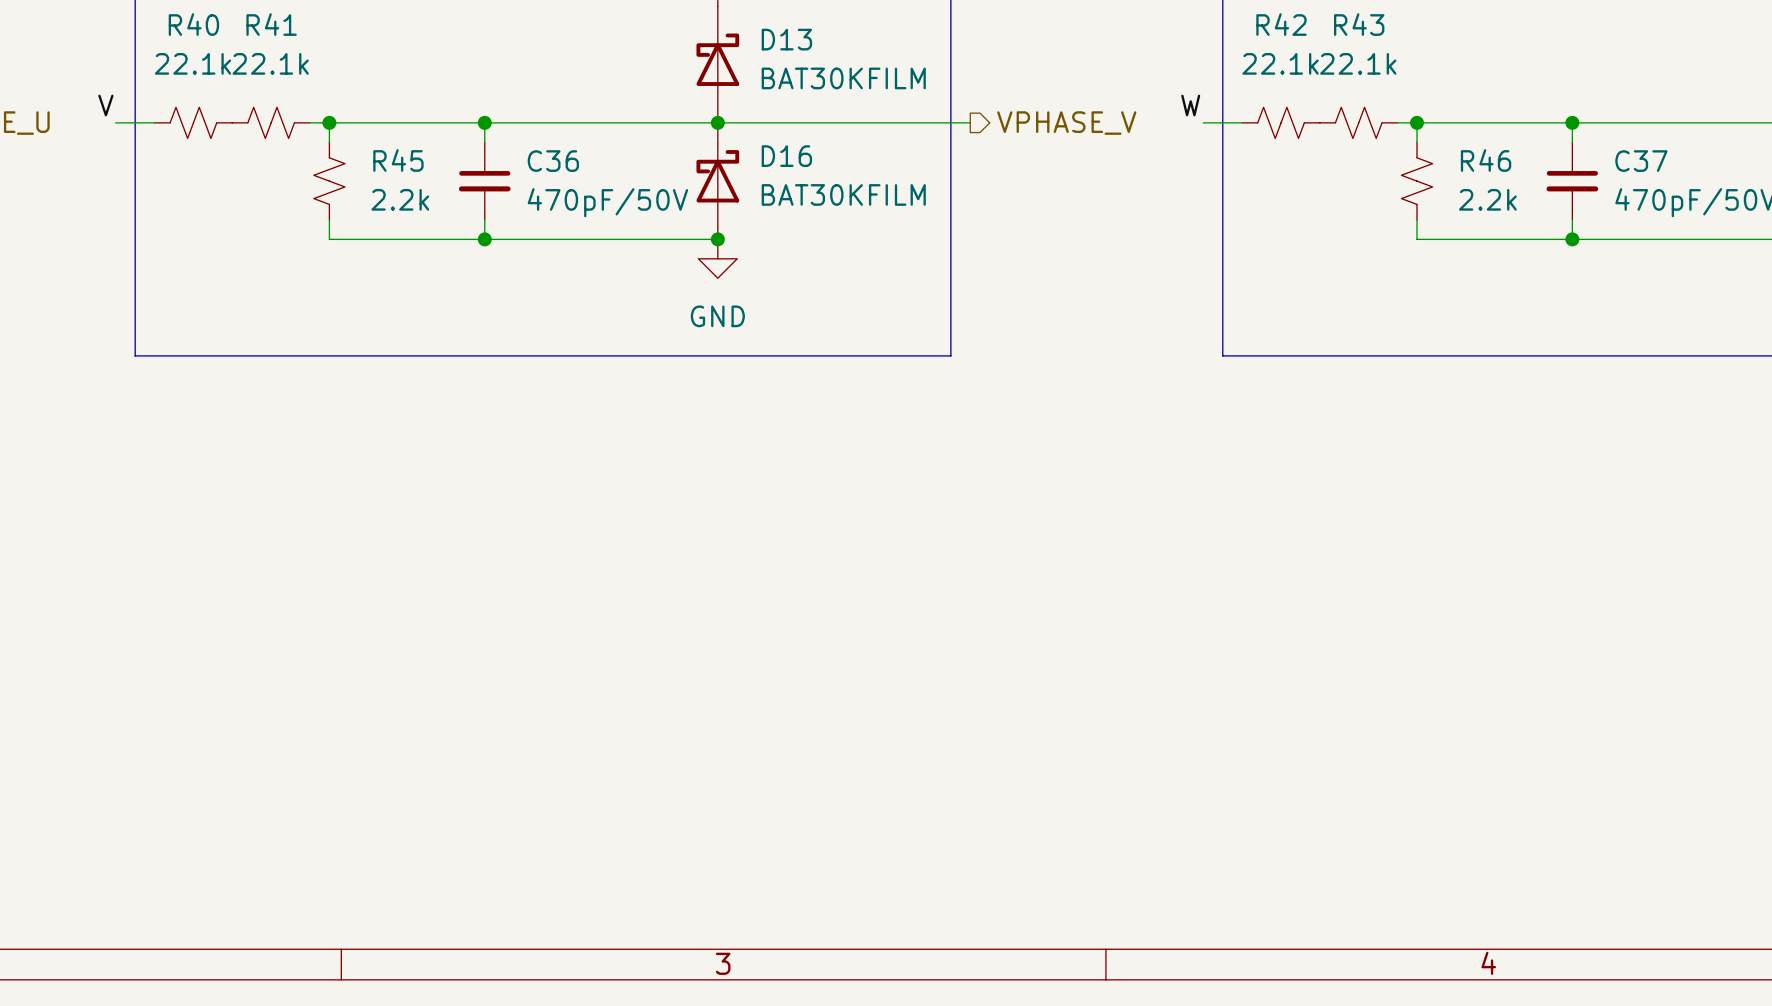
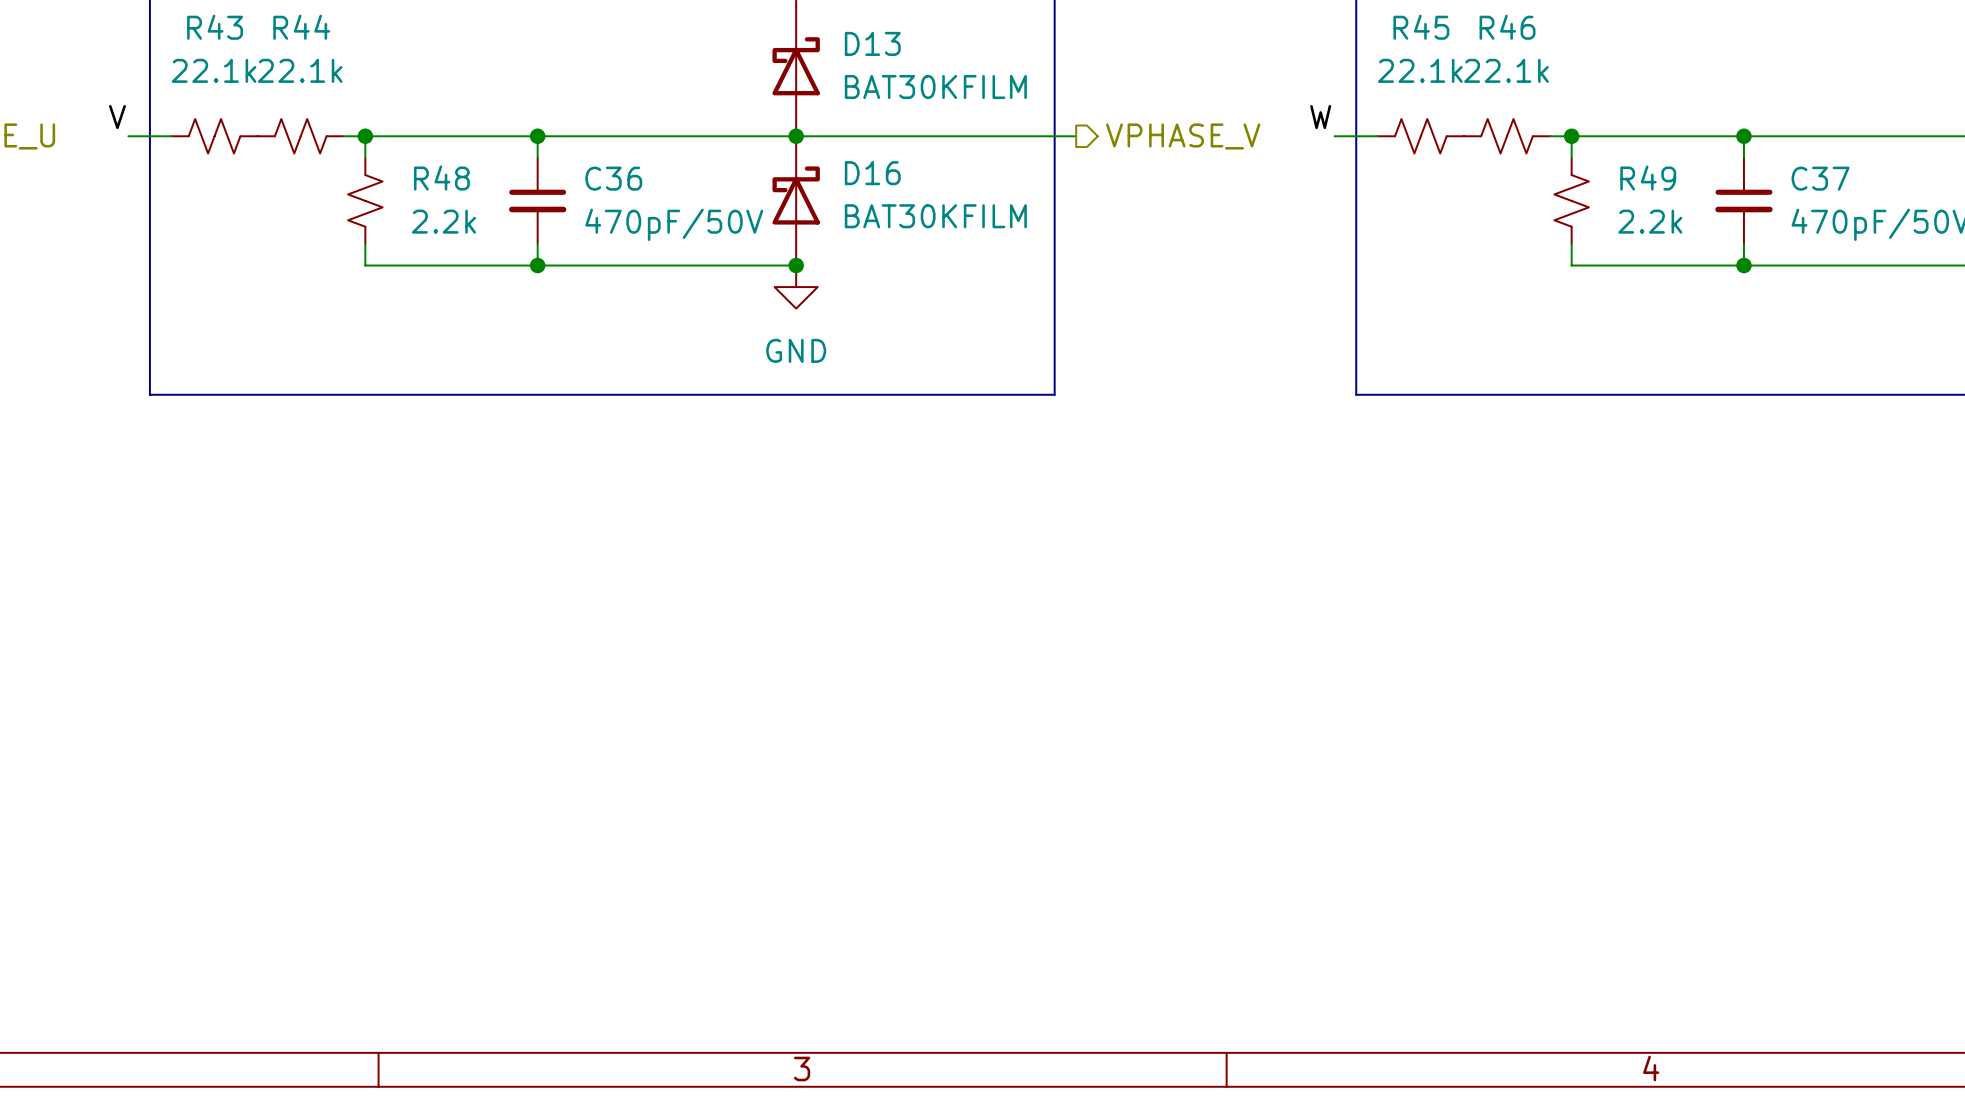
R40 name: R40 (193, 24) -> R43 (215, 27)
R41 name: R41 (271, 24) -> R44 (301, 27)
R42 name: R42 (1281, 24) -> R45 (1421, 27)
R43 name: R43 (1359, 24) -> R46 (1507, 27)
R45 name: R45 (398, 160) -> R48 (441, 178)
R46 name: R46 (1486, 160) -> R49 (1648, 178)

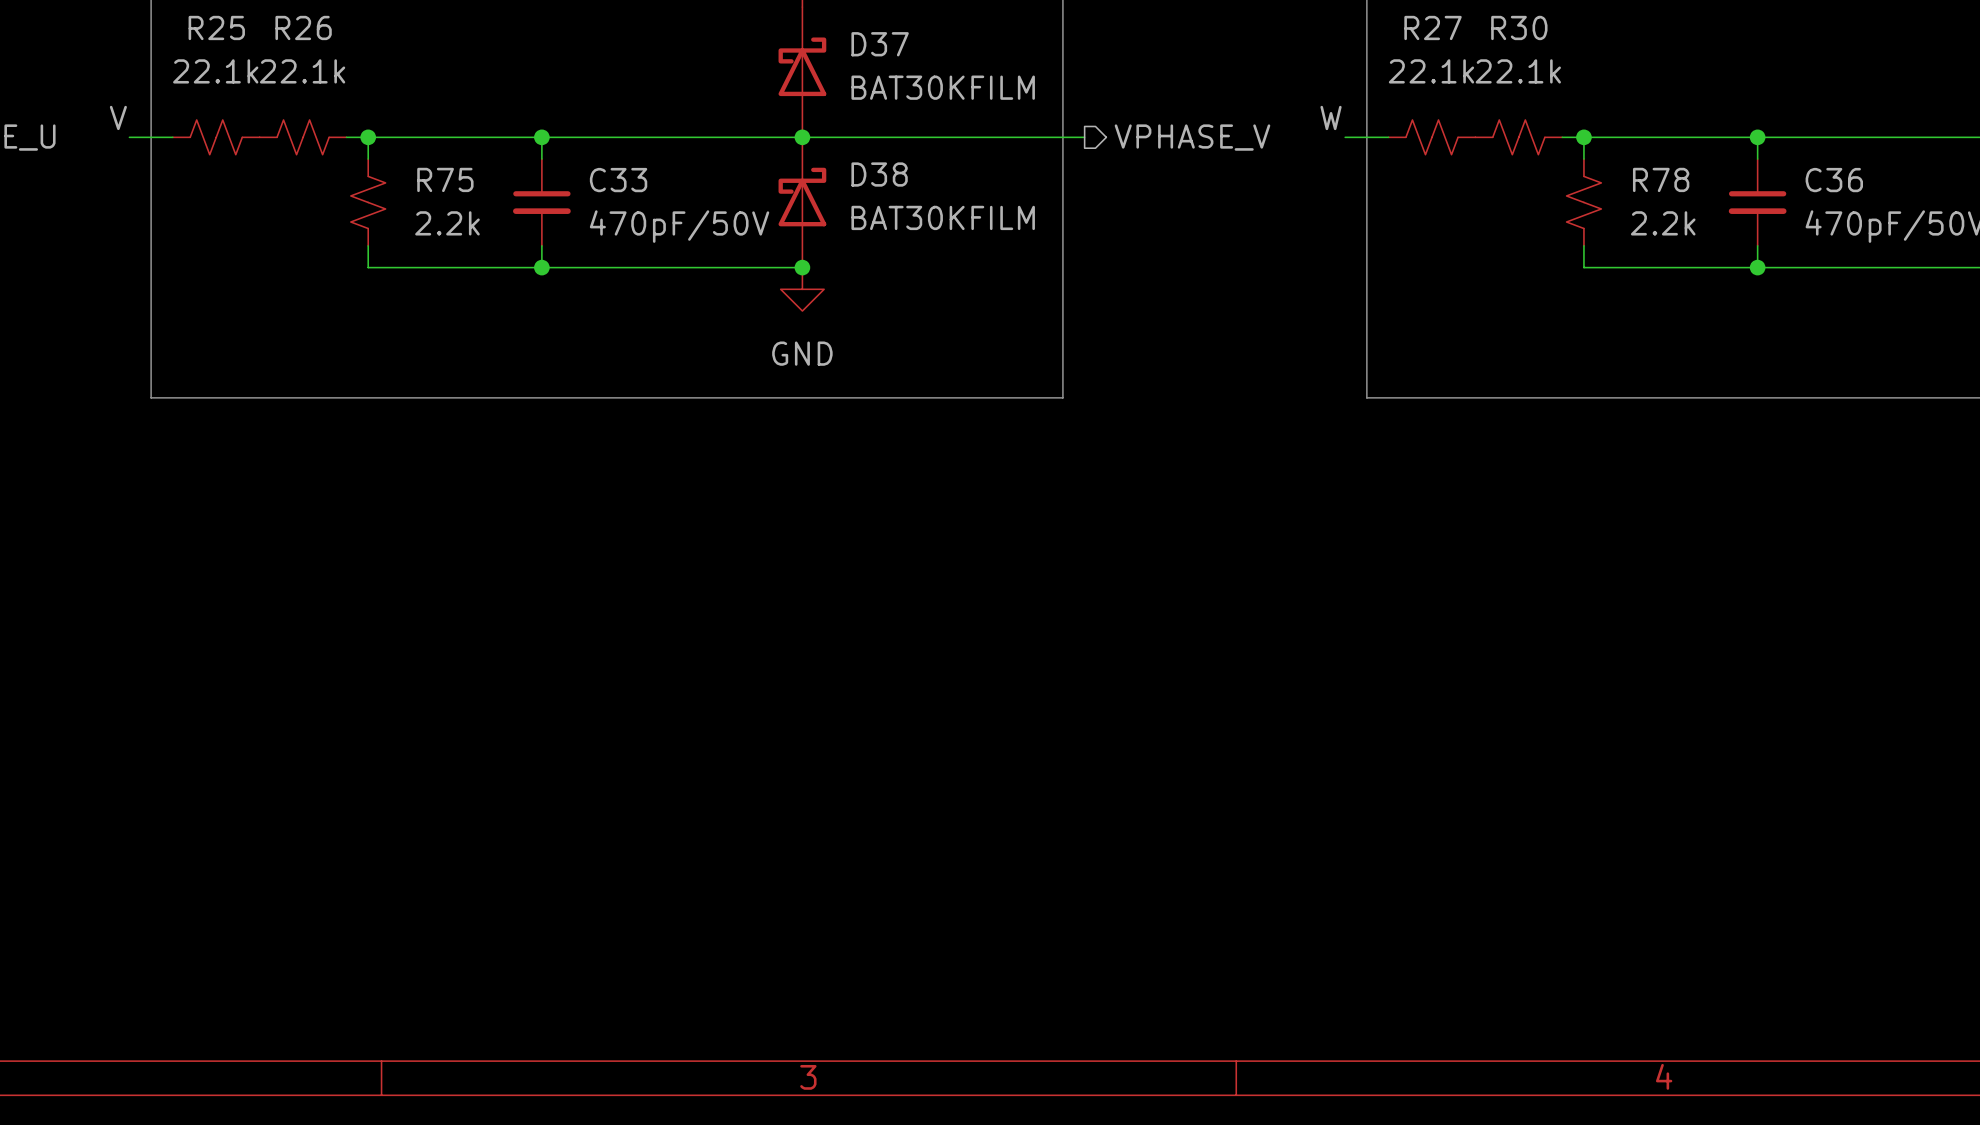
R43 name: R43 (215, 27) -> R25 (216, 27)
R44 name: R44 (301, 27) -> R26 (303, 27)
R45 name: R45 (1421, 27) -> R27 (1433, 27)
R46 name: R46 (1507, 27) -> R30 (1519, 27)
D13 name: D13 (872, 43) -> D37 (880, 44)
D16 name: D16 (872, 173) -> D38 (879, 174)
R48 name: R48 (441, 178) -> R75 (445, 179)
C36 name: C36 (613, 178) -> C33 (618, 180)
R49 name: R49 (1648, 178) -> R78 (1661, 179)
C37 name: C37 (1820, 178) -> C36 (1834, 180)

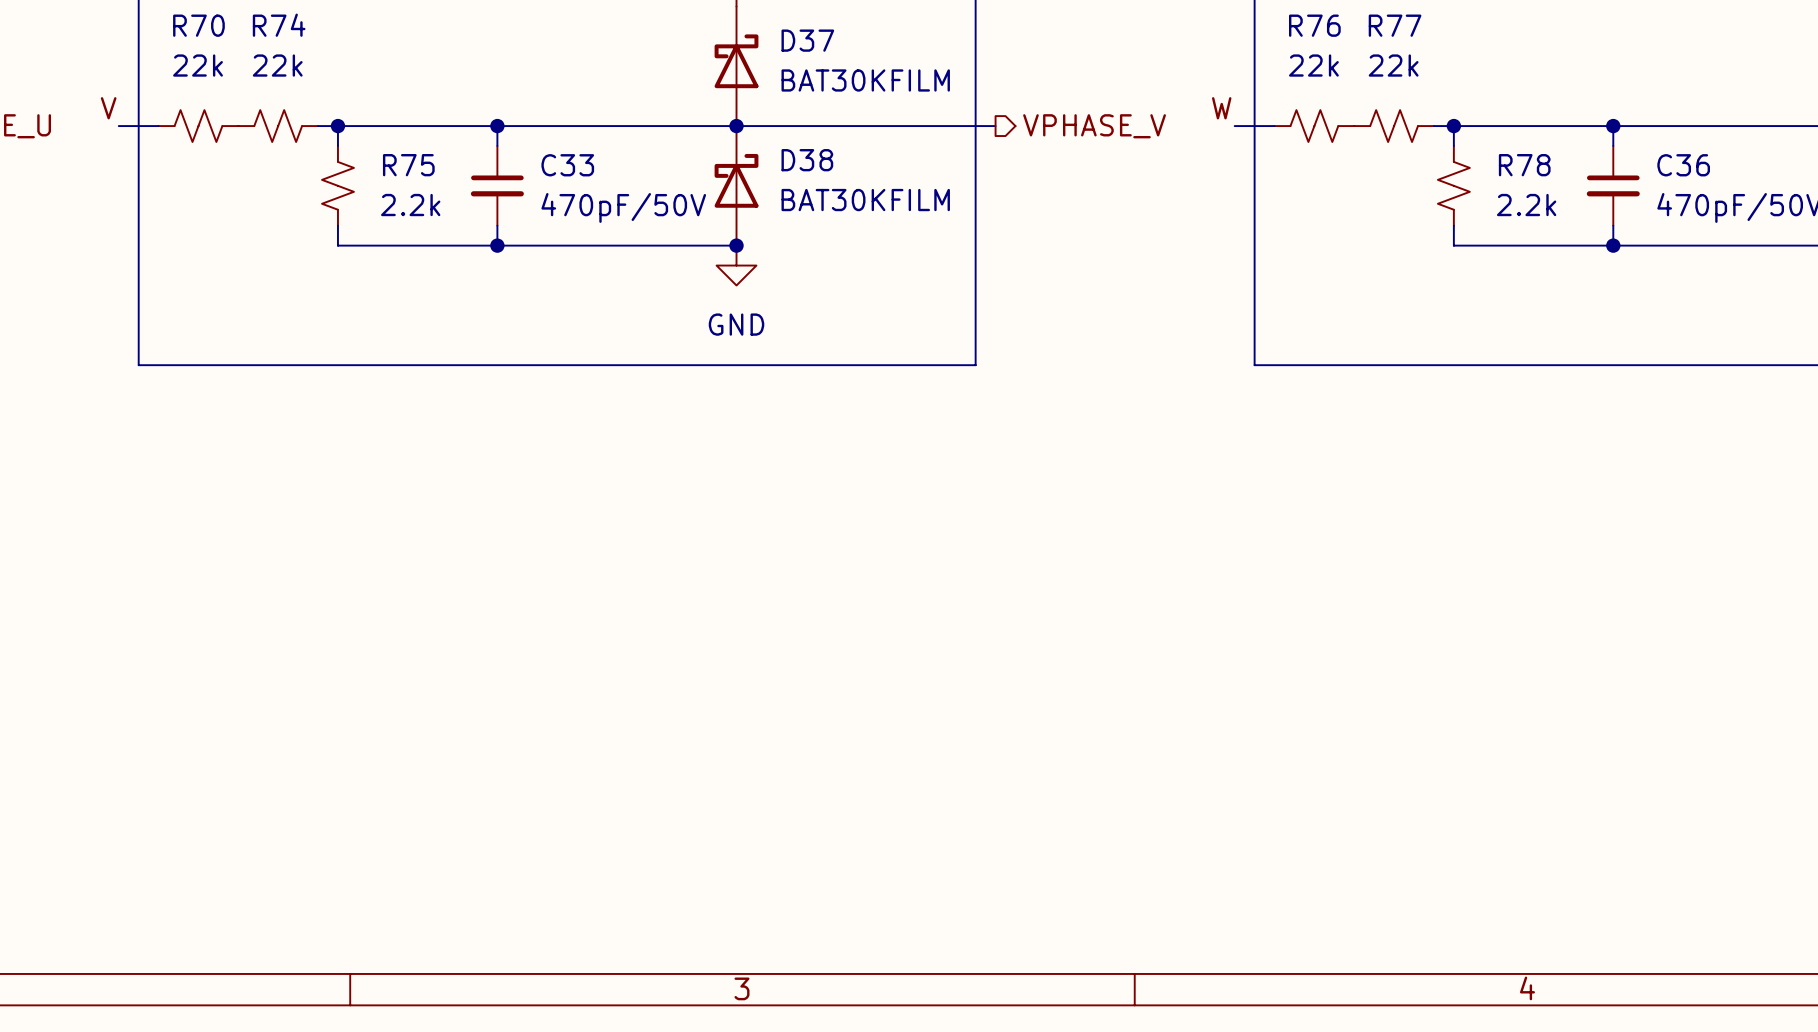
R25 name: R25 (216, 27) -> R70 (198, 25)
R26 name: R26 (303, 27) -> R74 (279, 25)
R27 name: R27 (1433, 27) -> R76 (1314, 25)
R30 name: R30 (1519, 27) -> R77 (1395, 25)
R25 value: 22.1k (215, 71) -> 22k (198, 65)
R26 value: 22.1k (302, 71) -> 22k (277, 65)
R27 value: 22.1k (1431, 71) -> 22k (1313, 65)
R30 value: 22.1k (1518, 71) -> 22k (1393, 65)

